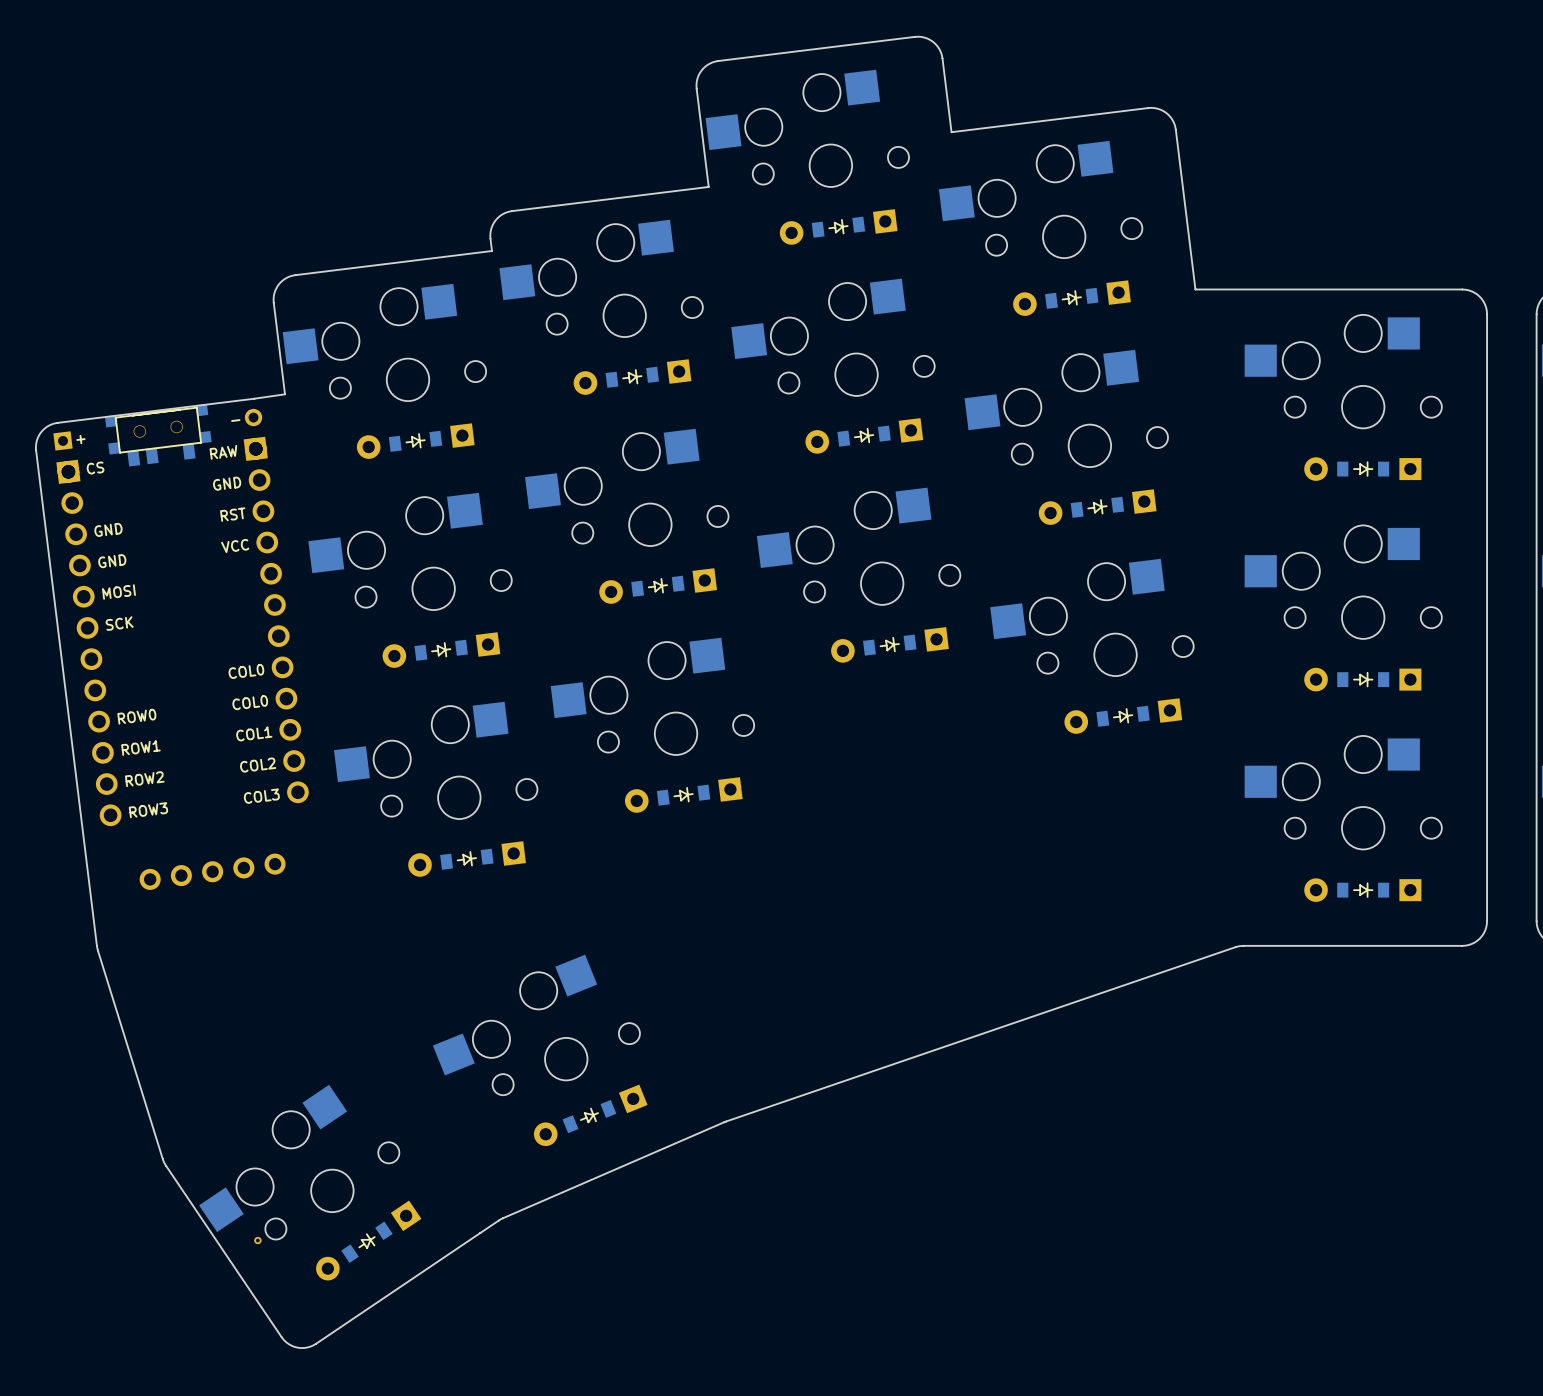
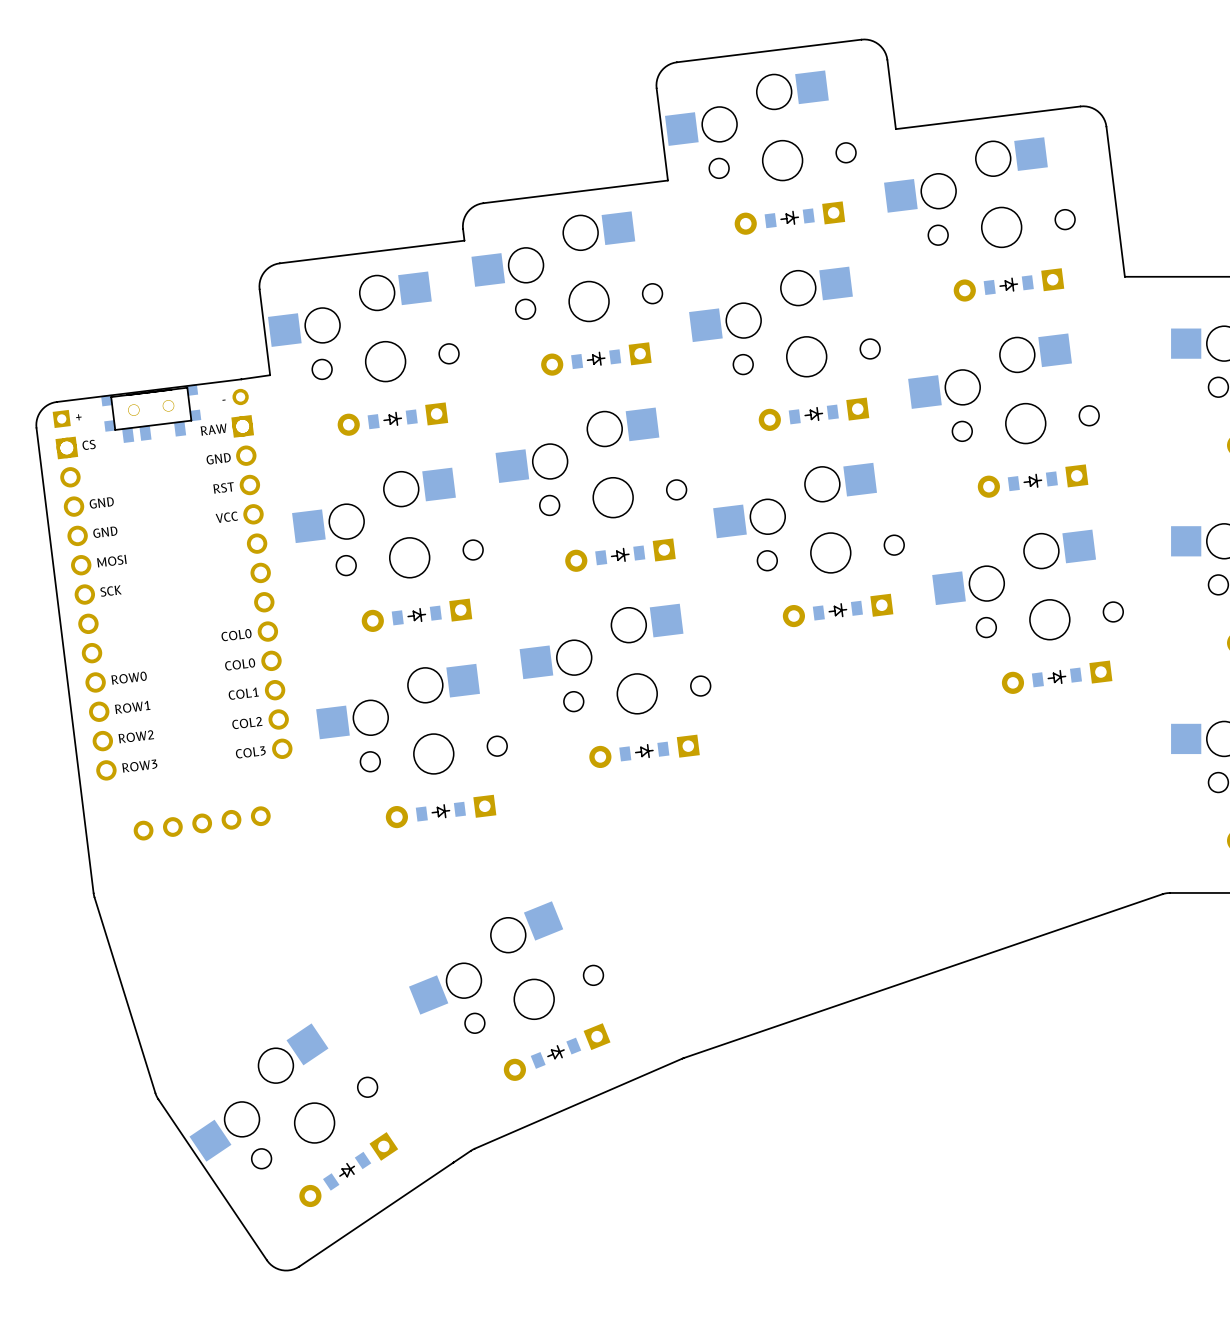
part: (257, 1240) -> none

